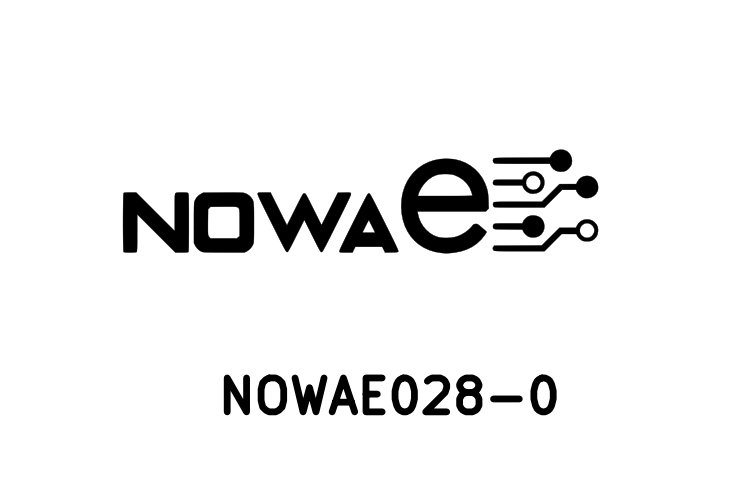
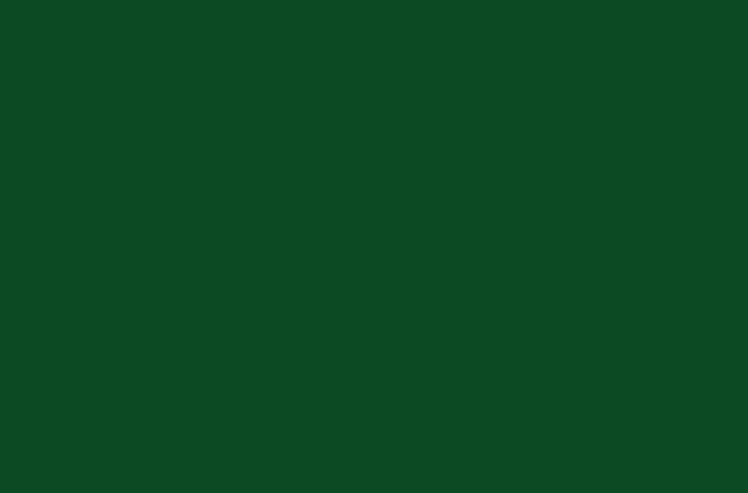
drawing: [122, 149, 599, 254] -> none
text: NOWAE028-0 (390, 394) -> none

